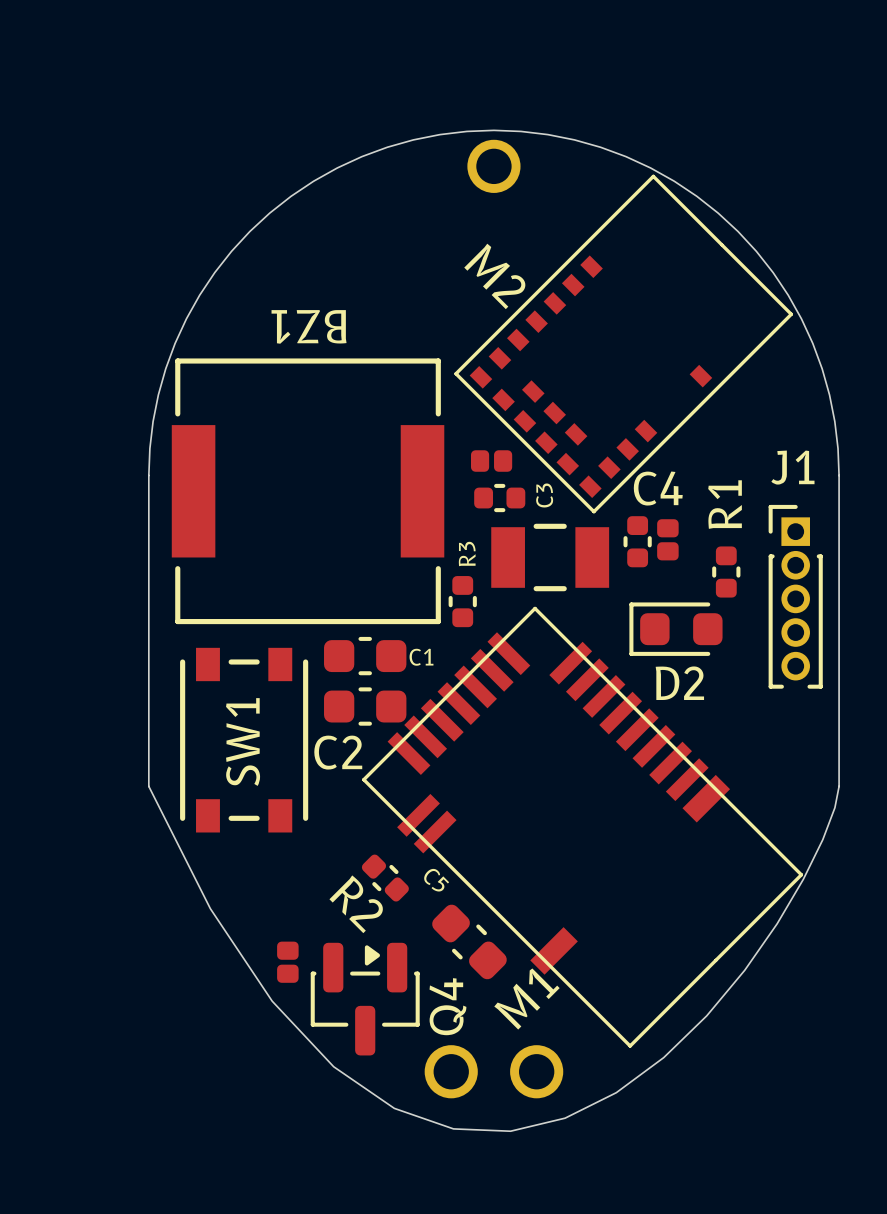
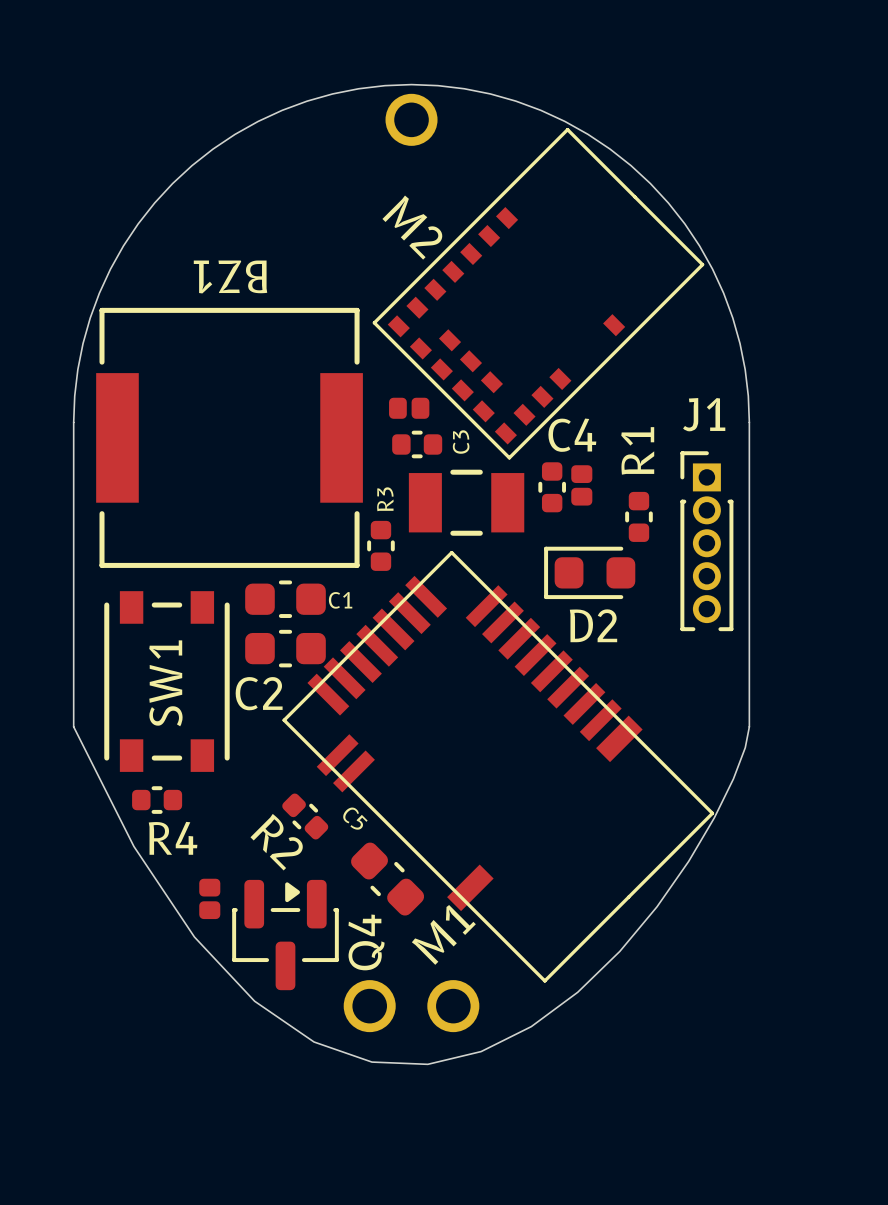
R4: none -> (157, 800)

